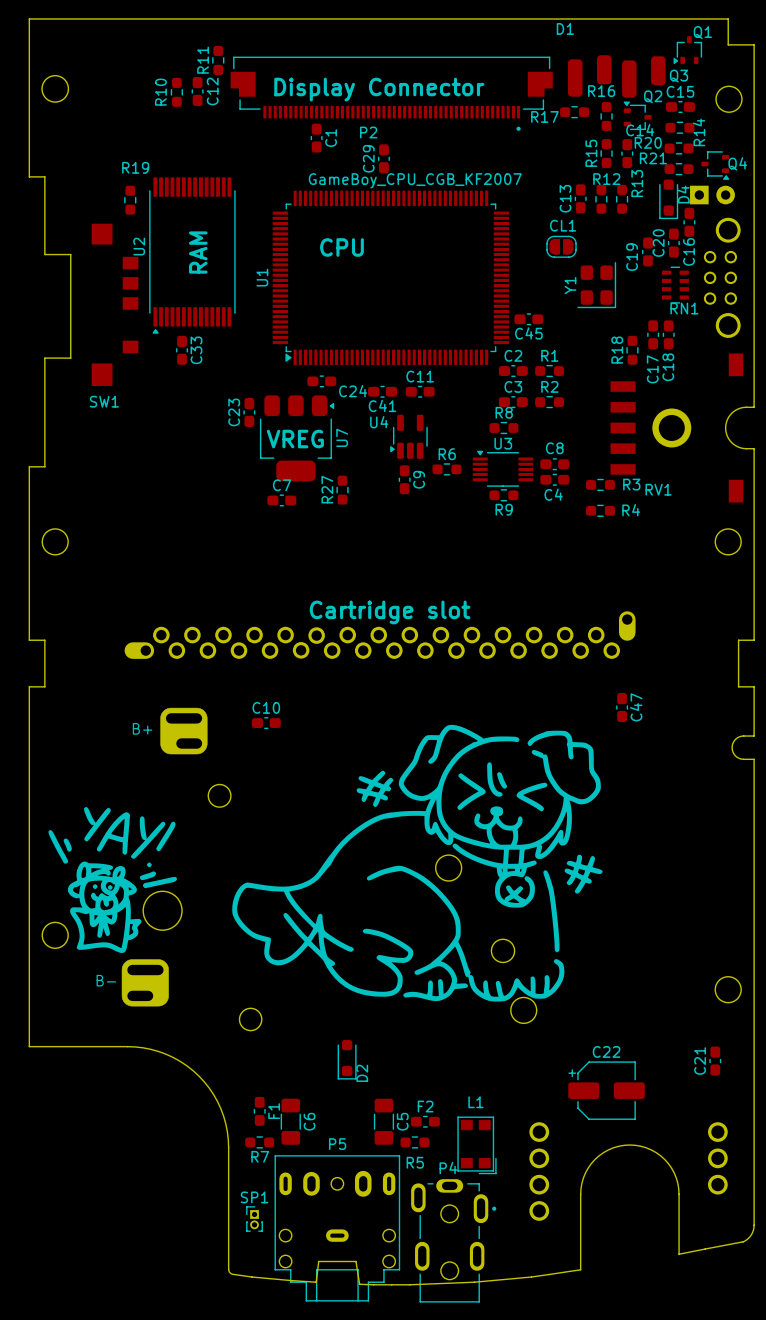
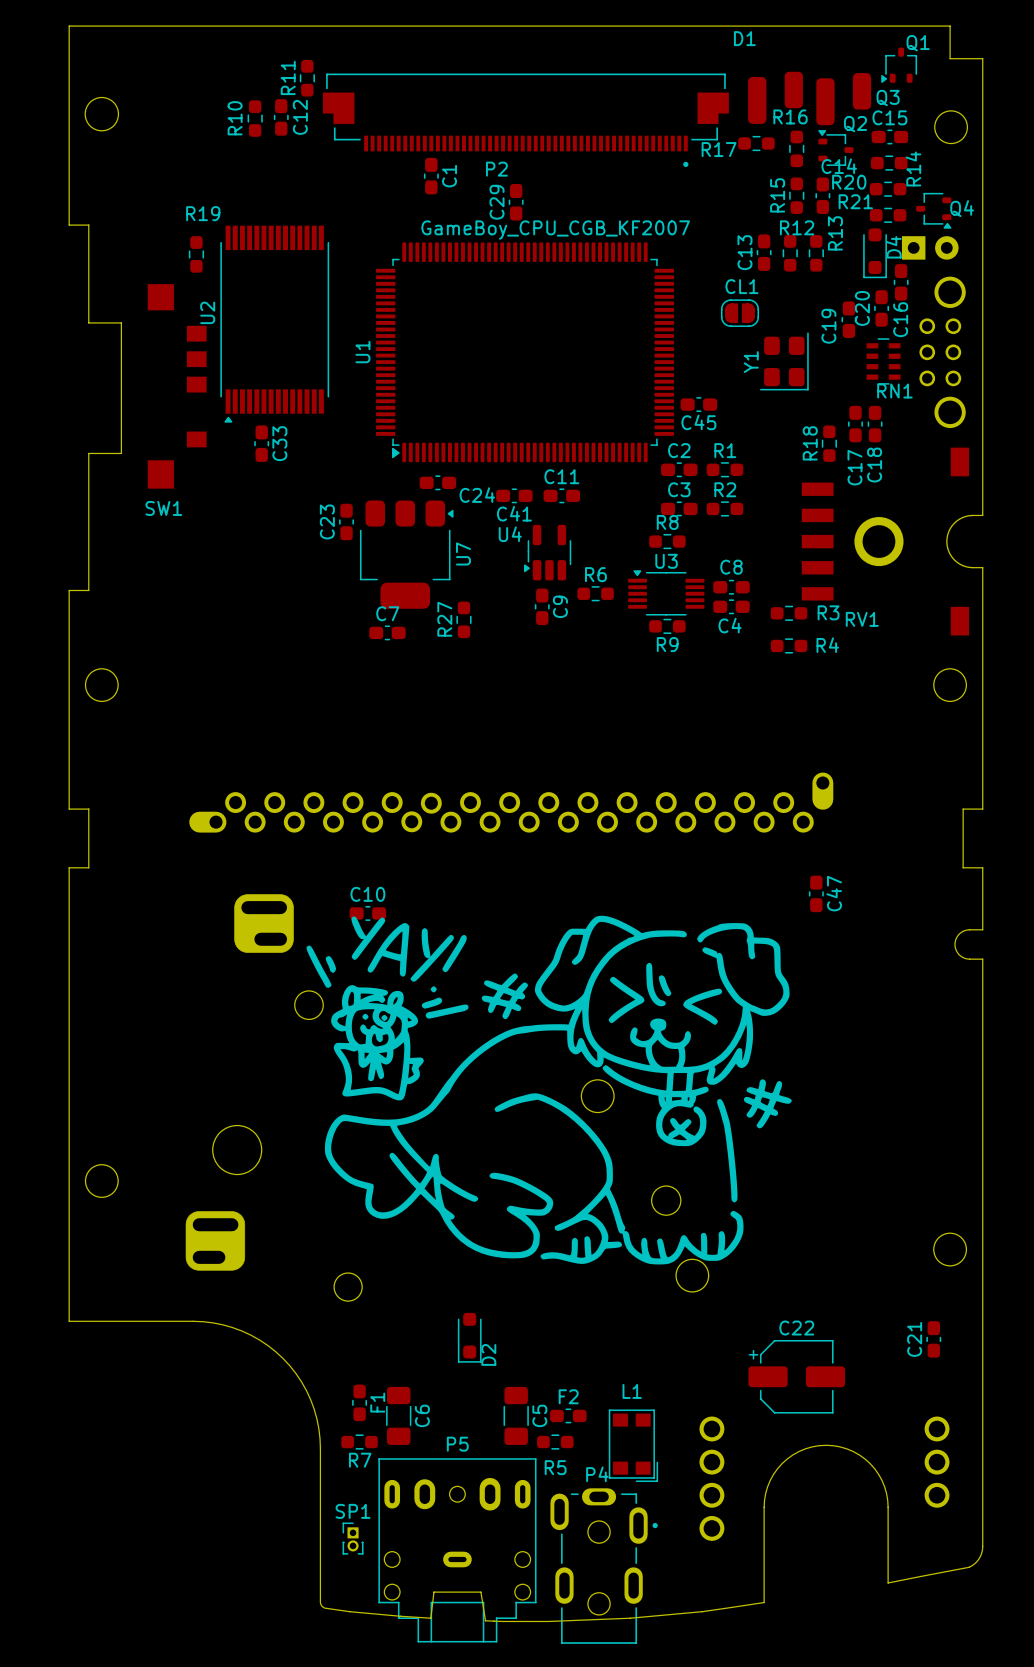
text: Display Connector (379, 89) -> none
text: CPU (341, 247) -> none
text: RAM (198, 252) -> none
text: VREG (295, 439) -> none
text: Cartridge slot (390, 612) -> none
drawing shape: [232, 724, 603, 1002] -> [306, 915, 792, 1265]
text: B+ (142, 728) -> none
drawing: [48, 807, 177, 954] -> none
text: B- (106, 980) -> none

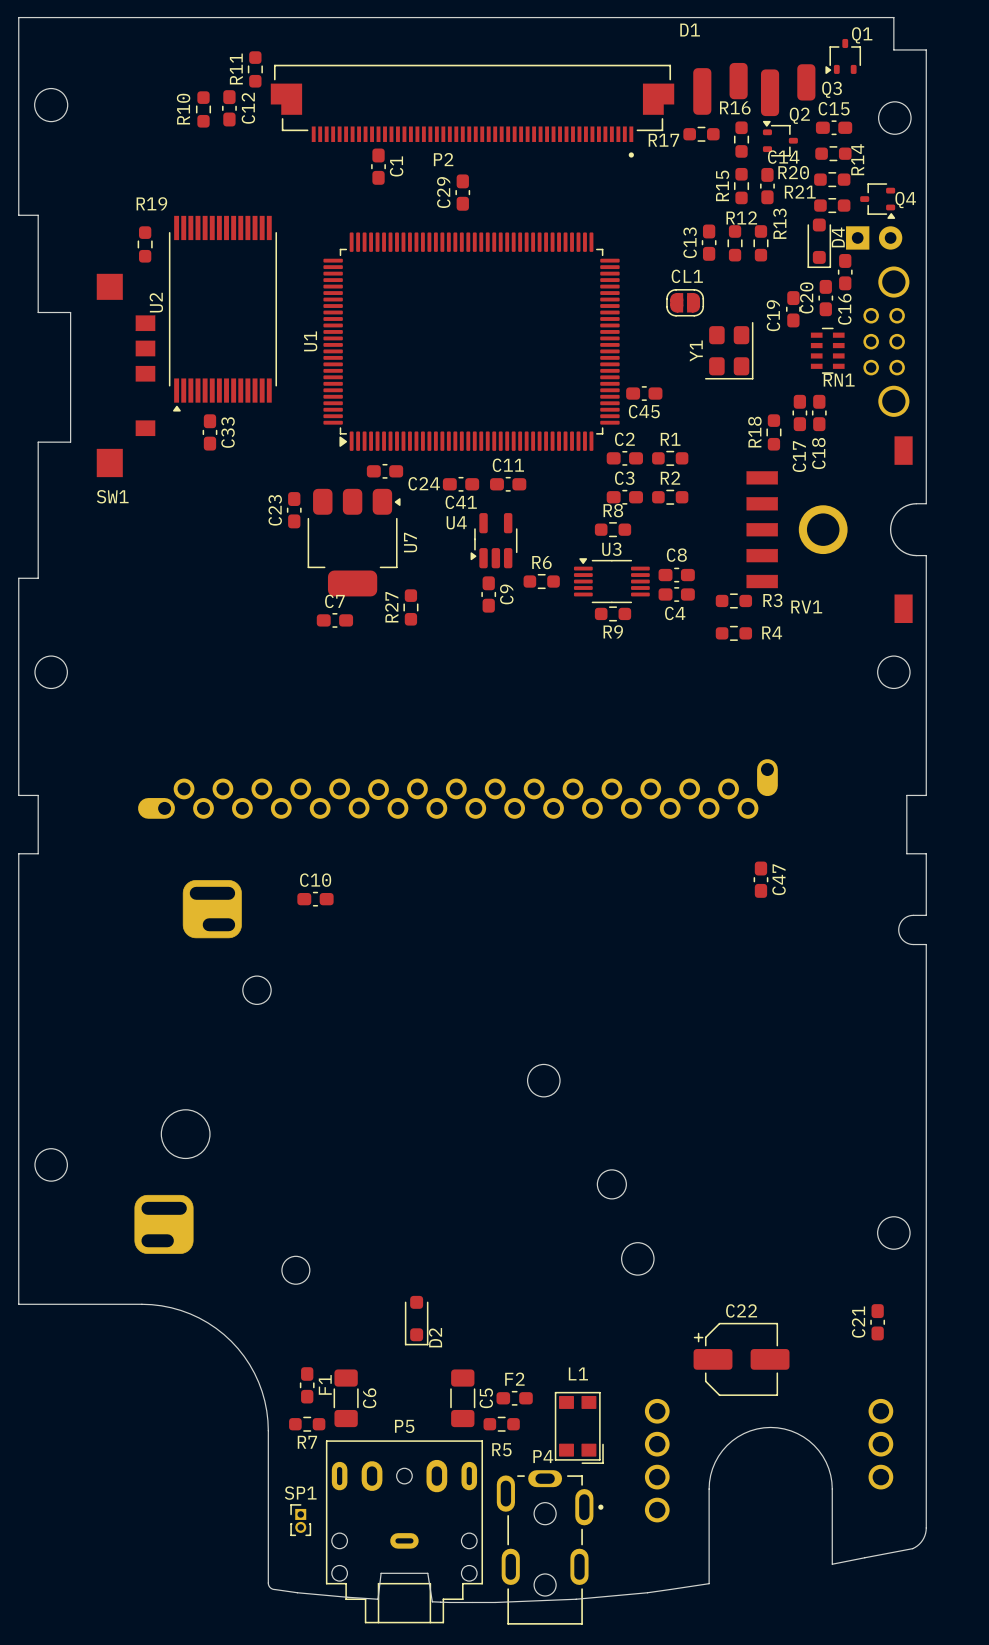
U1 value: GameBoy_CPU_CGB_KF2007 (555, 230) -> none
drawing: [306, 915, 792, 1265] -> none

